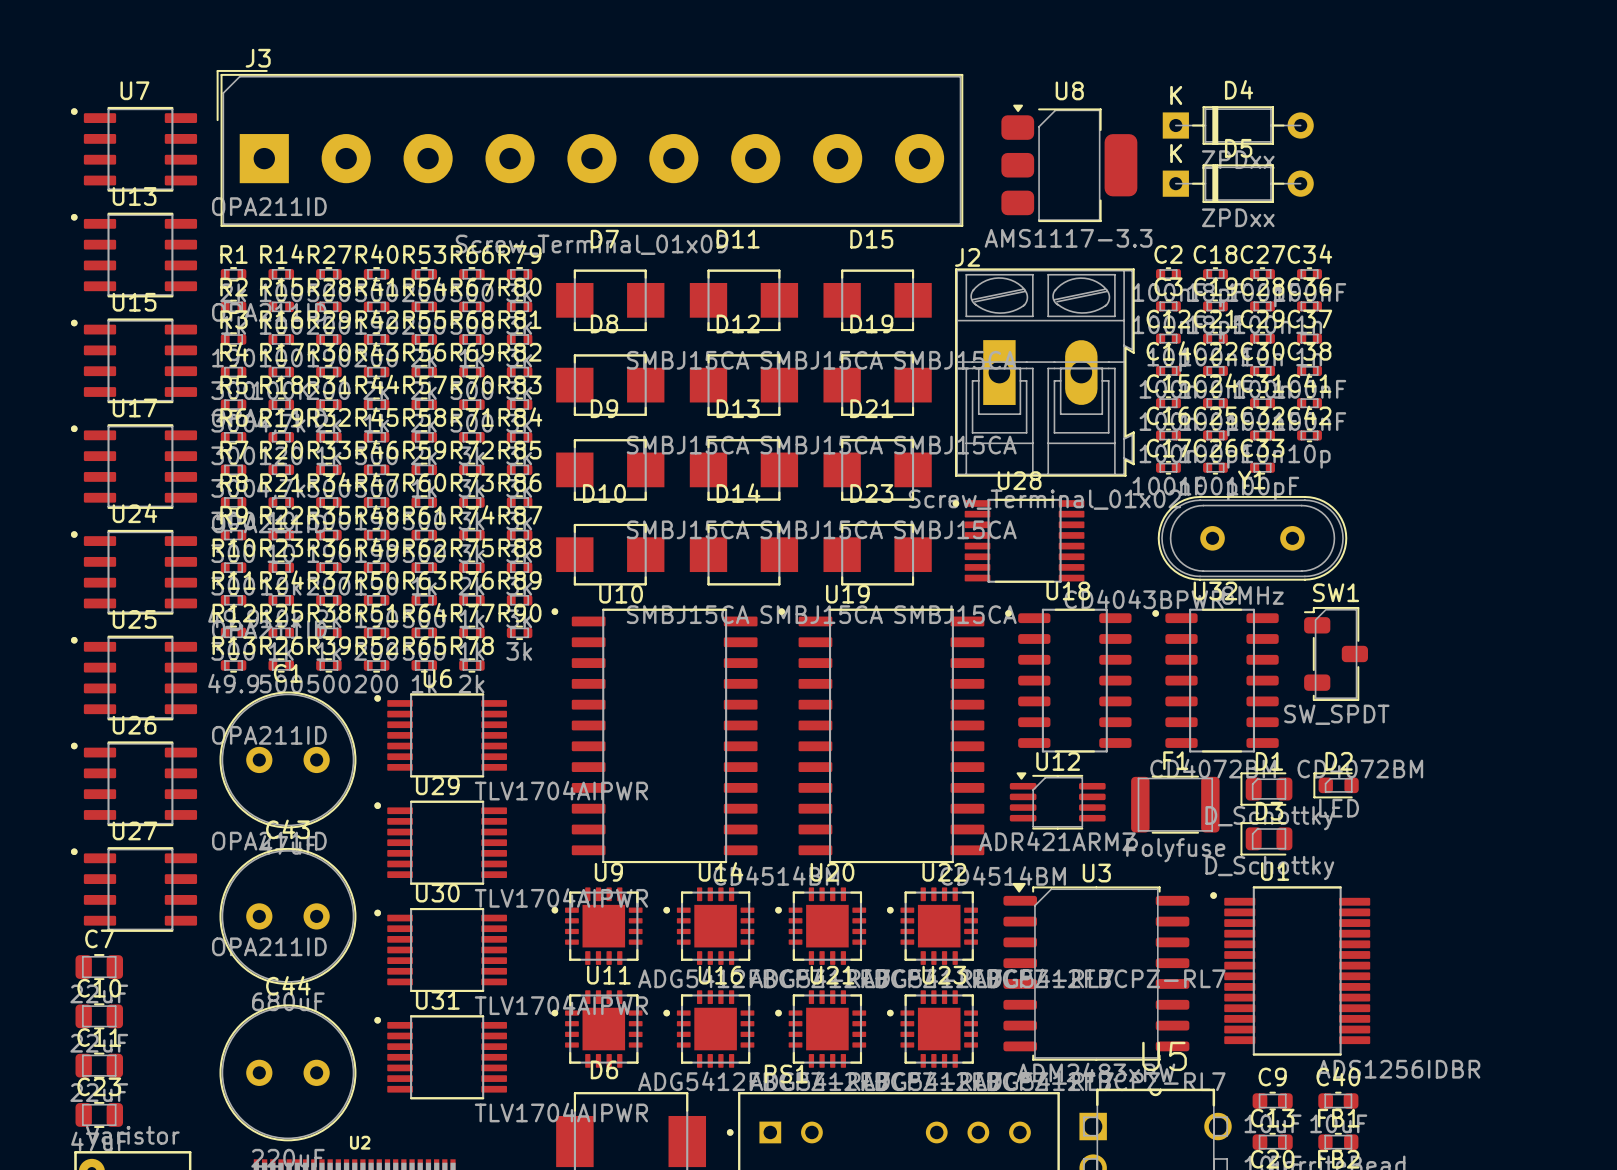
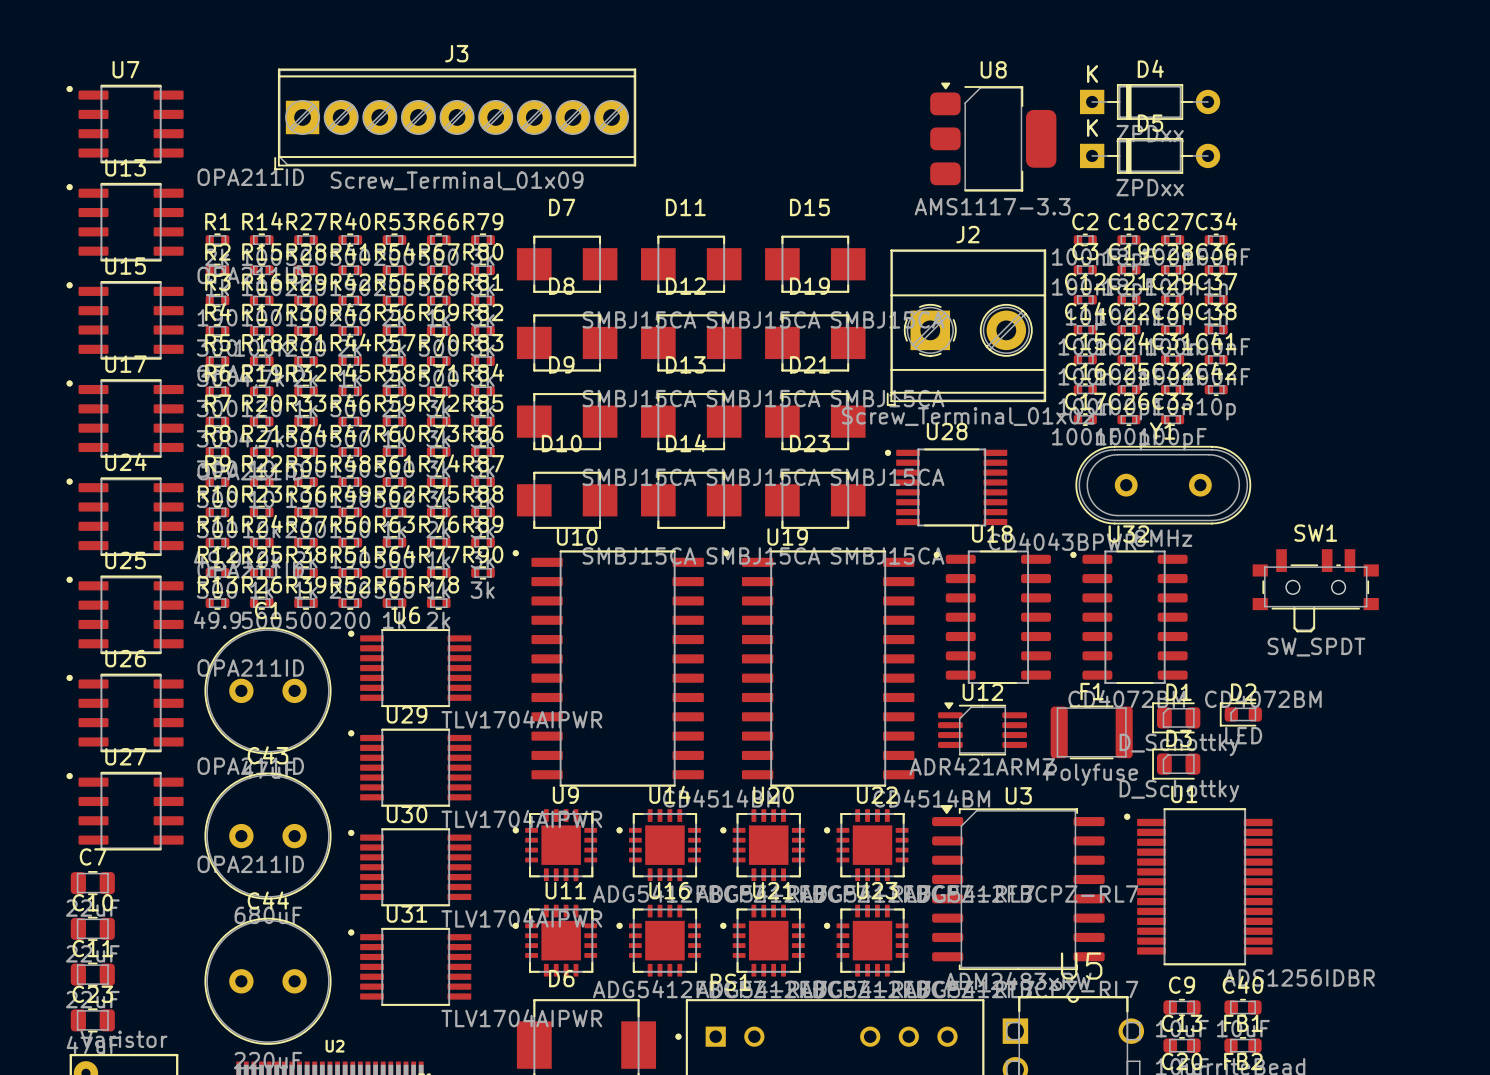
J3 name position: J3 (258, 58) -> J3 (456, 53)
J3 footprint: [216, 69, 964, 227] -> [274, 68, 637, 171]
J2 name position: J2 (967, 257) -> J2 (967, 234)
J2 footprint: [955, 268, 1135, 477] -> [886, 249, 1047, 406]
SW1 footprint: [1303, 606, 1369, 701] -> [1252, 549, 1379, 633]

